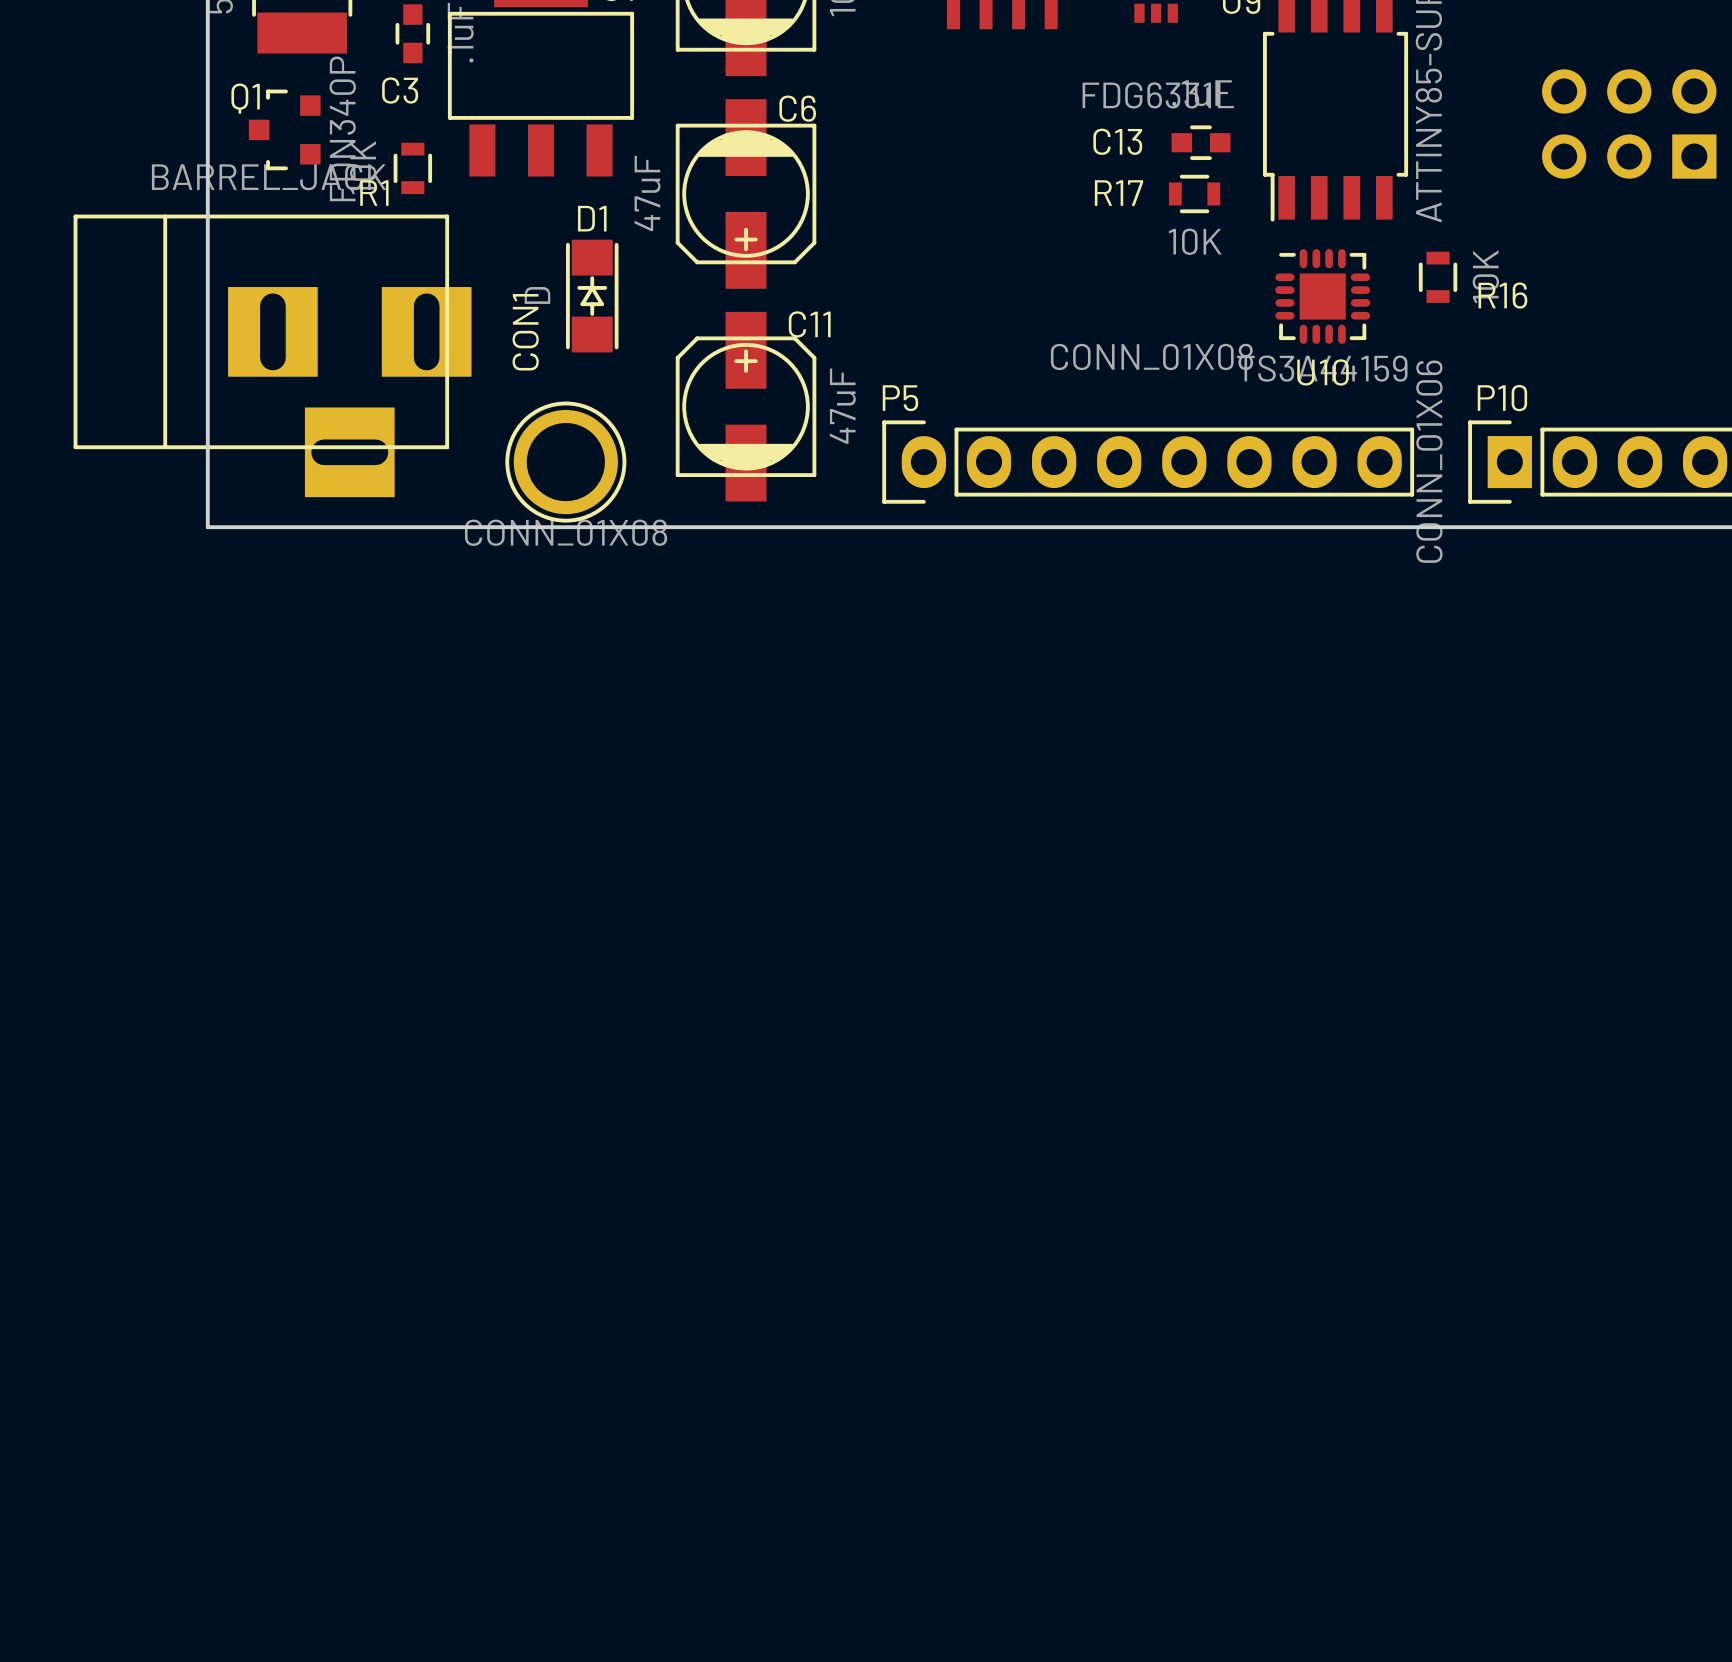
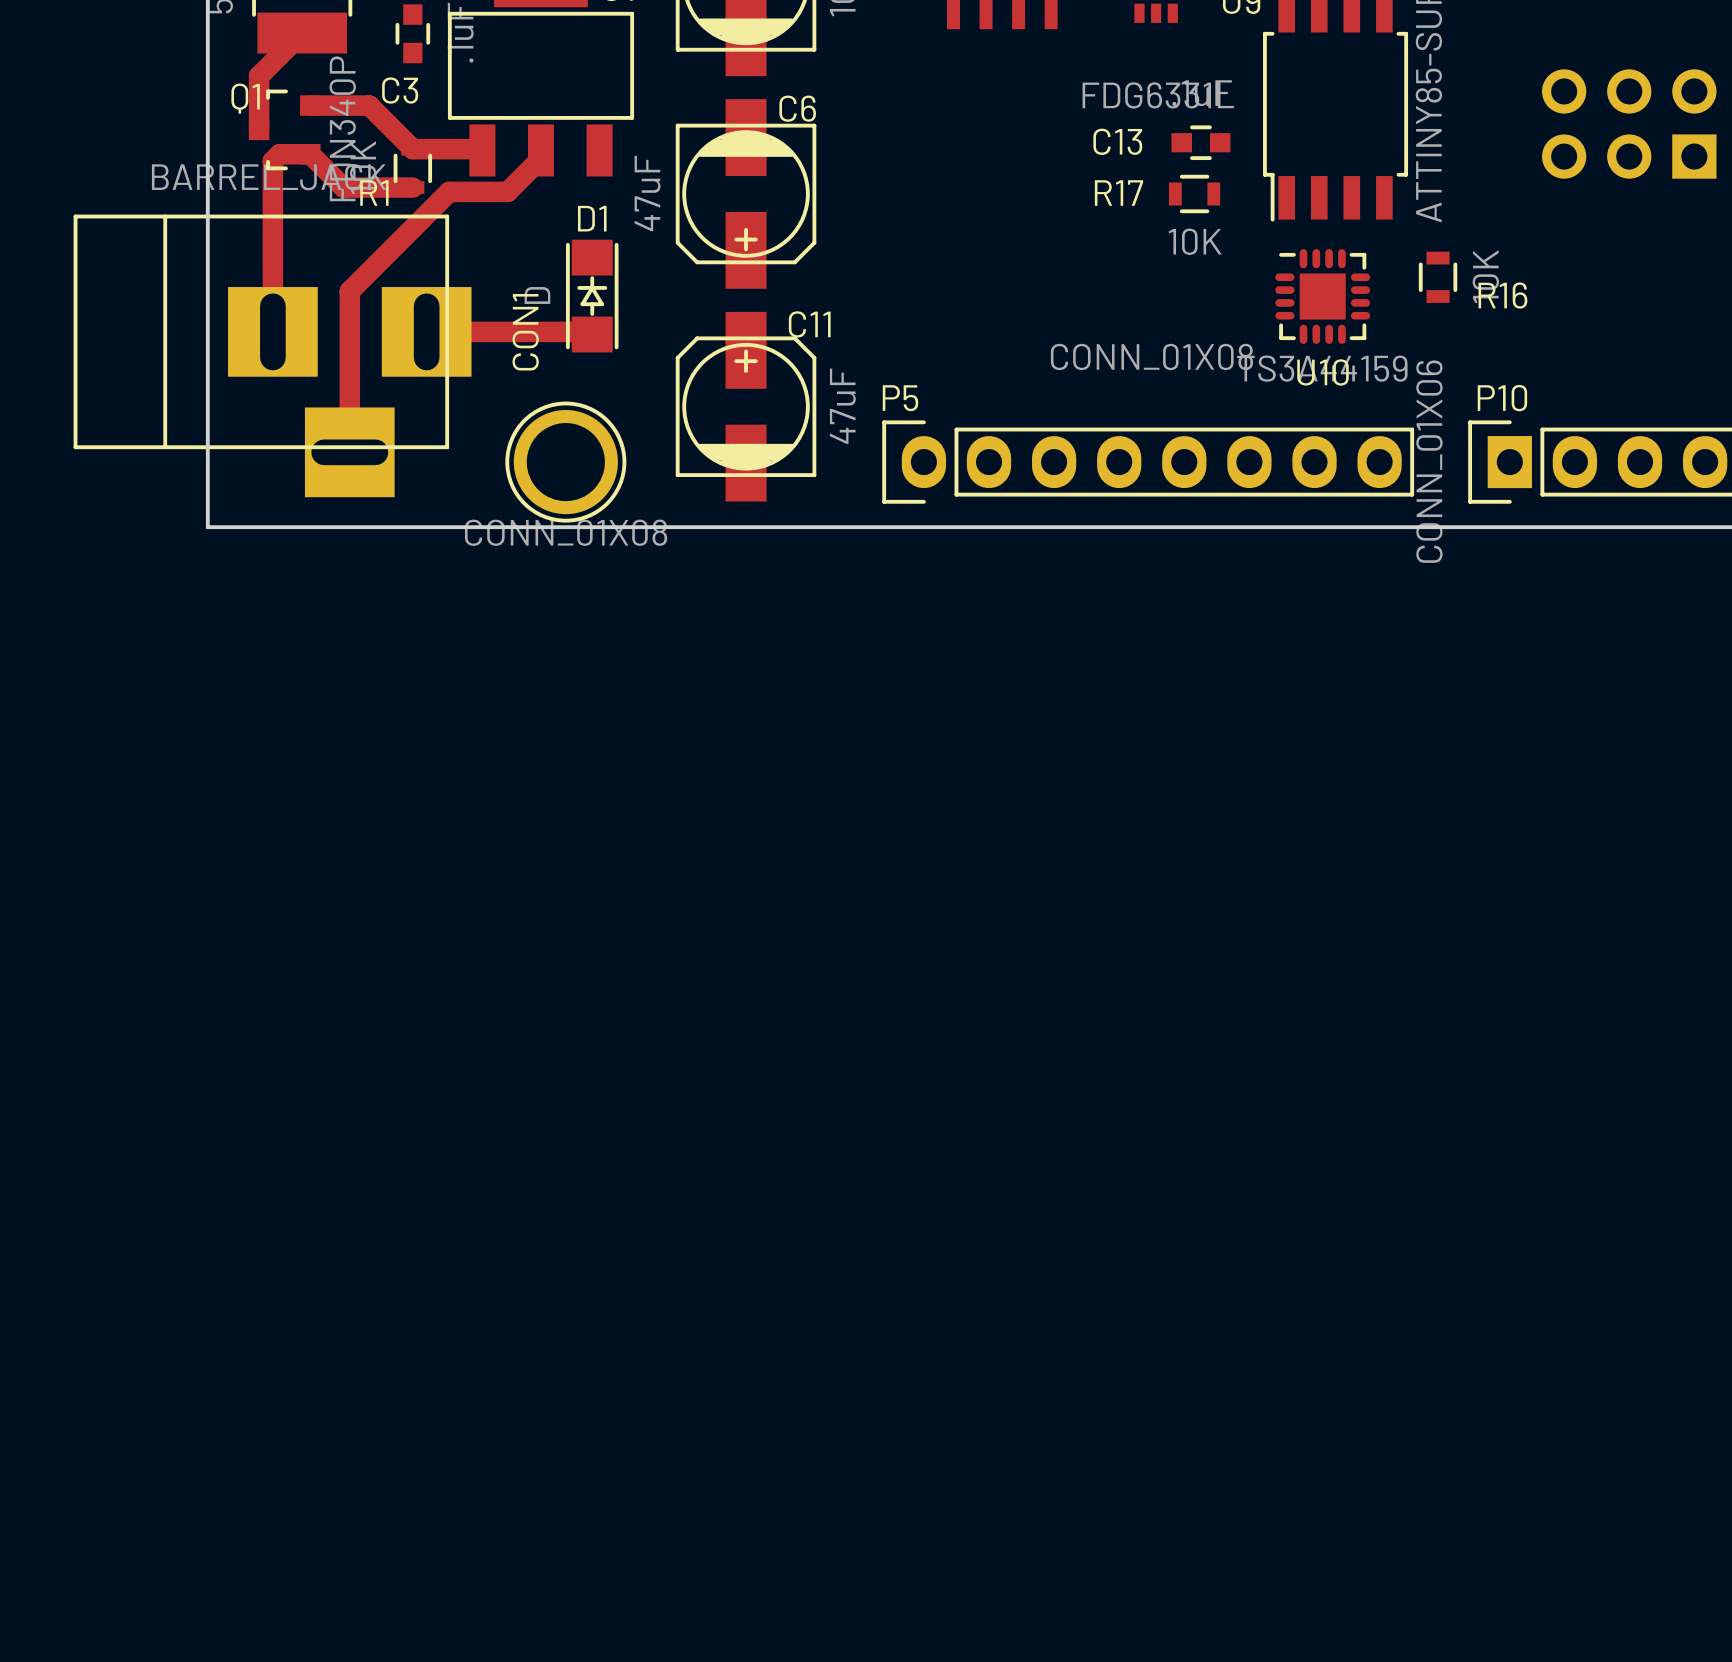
track: none -> (302, 33) (259, 76) (259, 129)
track: none -> (310, 105) (369, 105) (412, 149) (482, 150)
track: none -> (540, 150) (540, 158) (507, 191) (449, 191) (349, 291) (349, 452)
track: none -> (412, 187) (343, 187) (310, 154) (279, 154) (272, 160) (272, 331)
track: none -> (426, 331) (589, 331) (592, 334)

